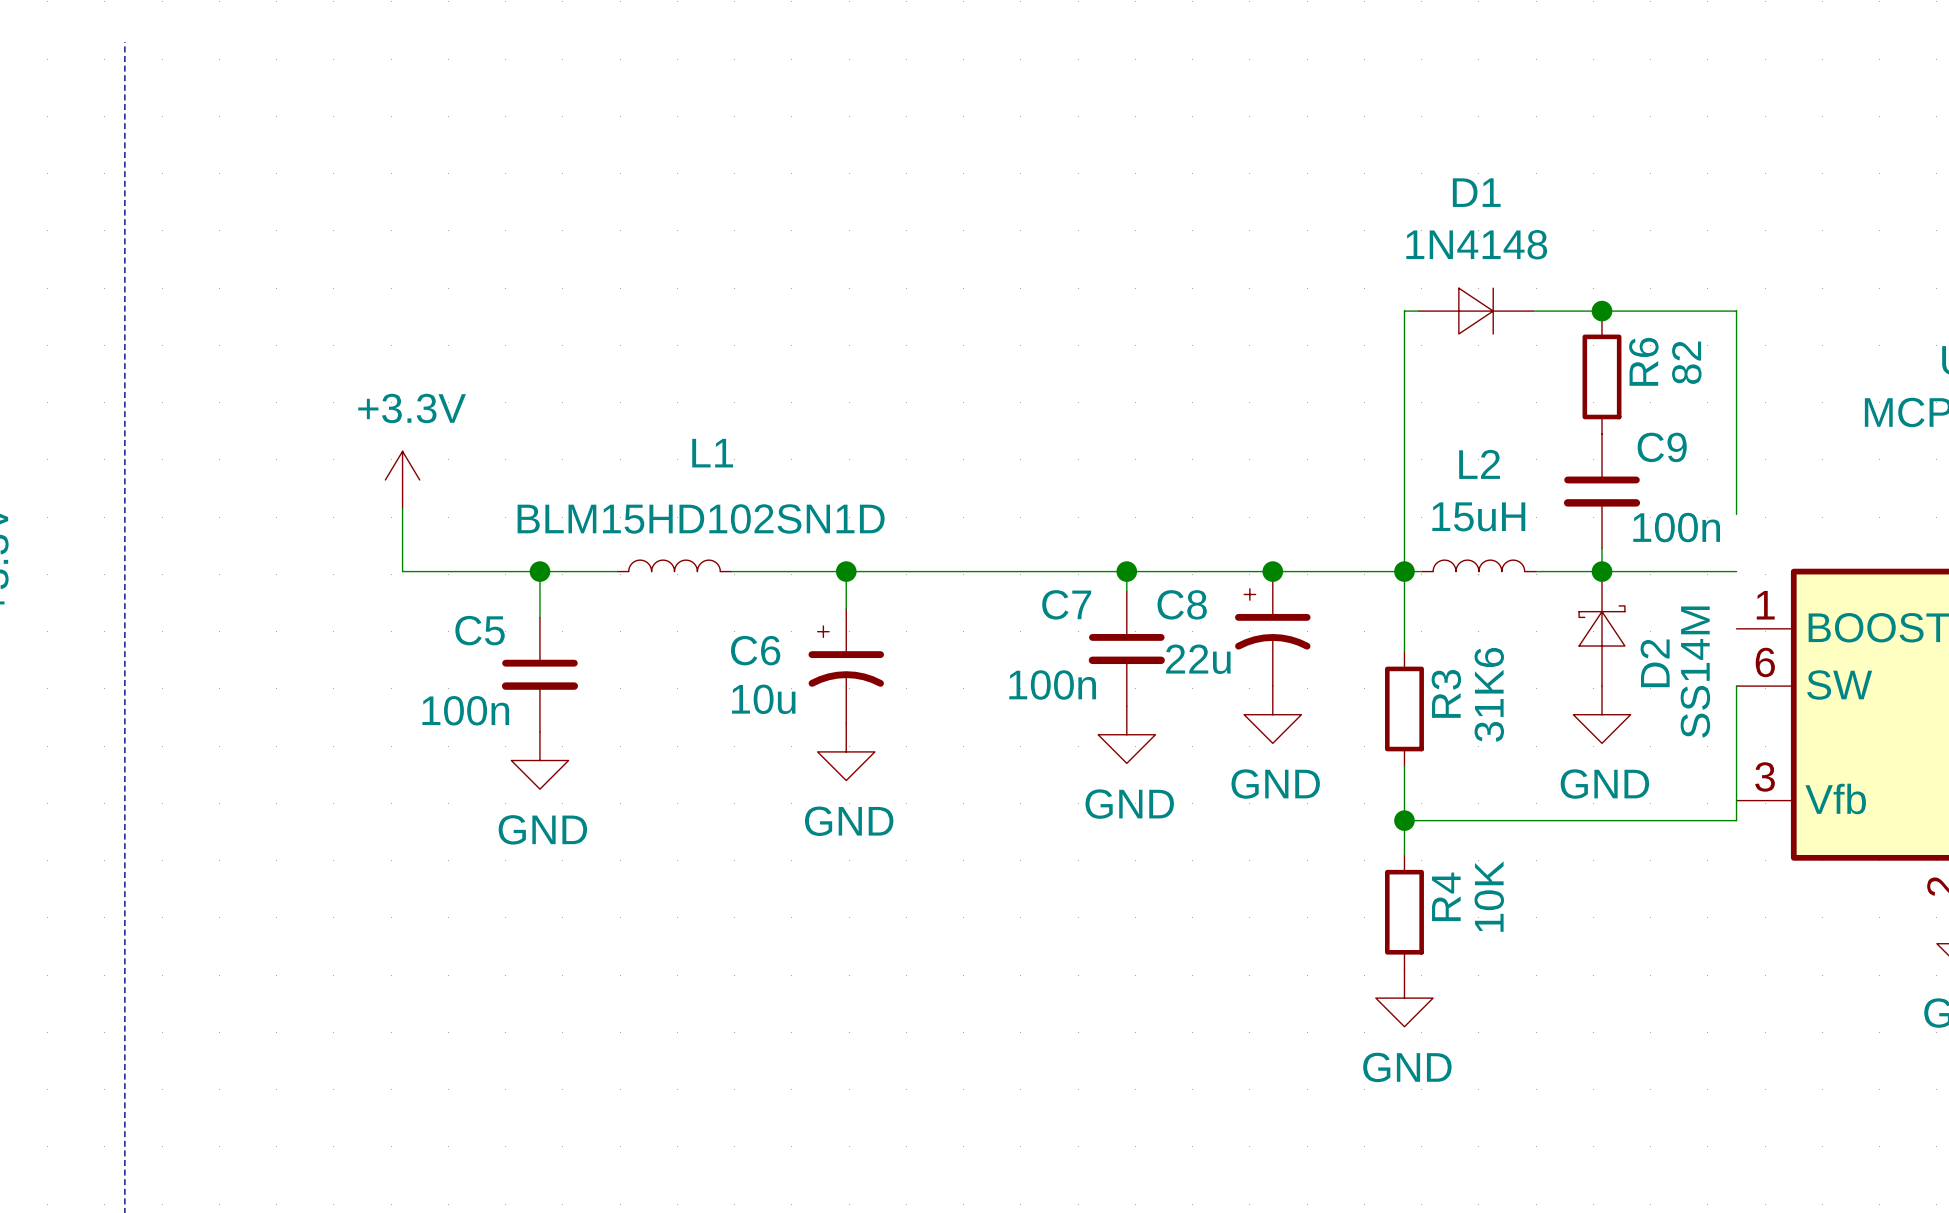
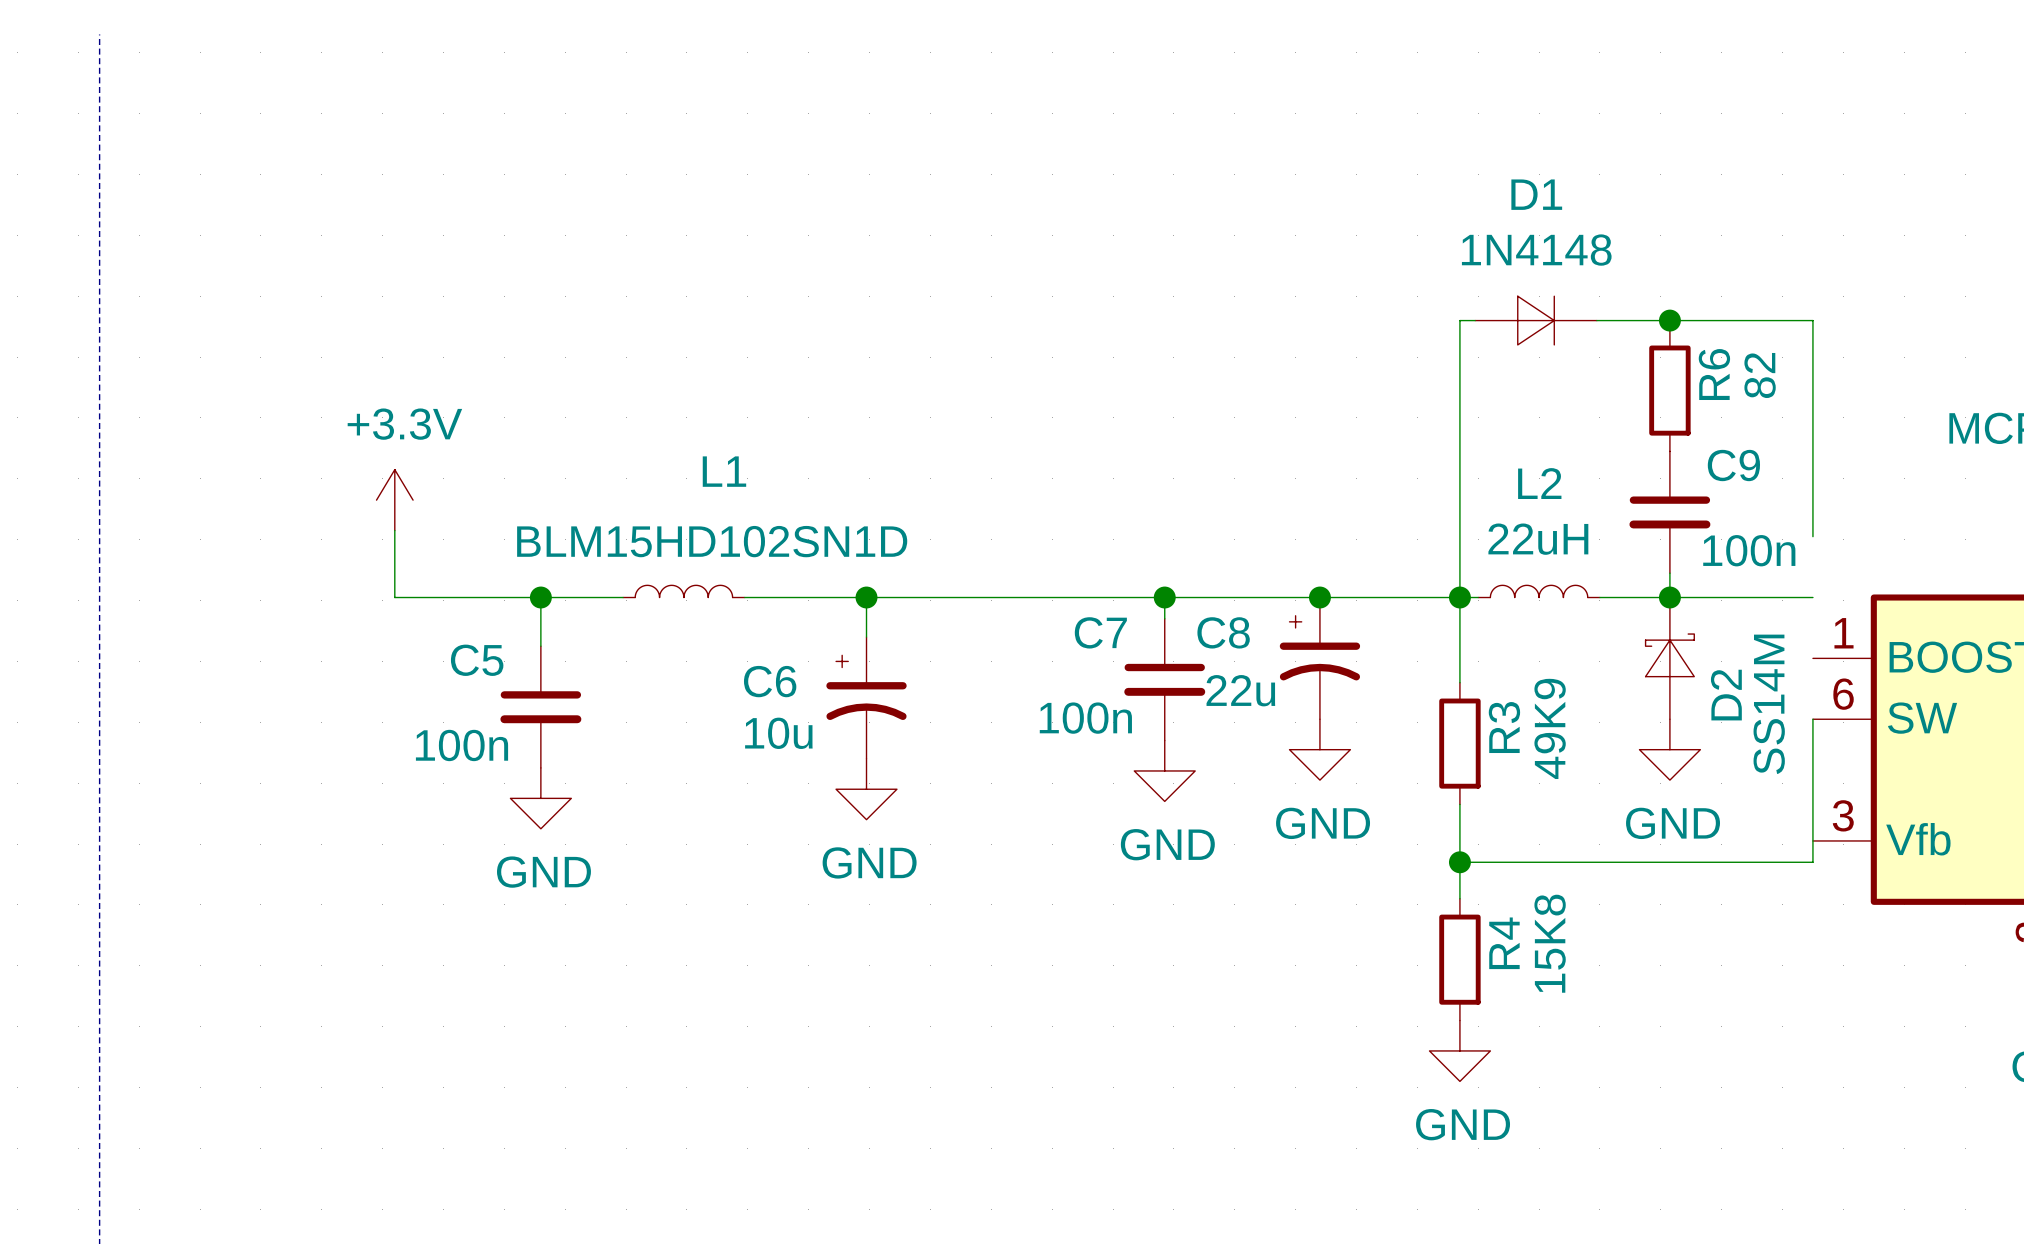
L2 value: 15uH (1478, 516) -> 22uH (1538, 539)
R3 value: 31K6 (1489, 694) -> 49K9 (1550, 728)
R4 value: 10K (1489, 896) -> 15K8 (1550, 943)

